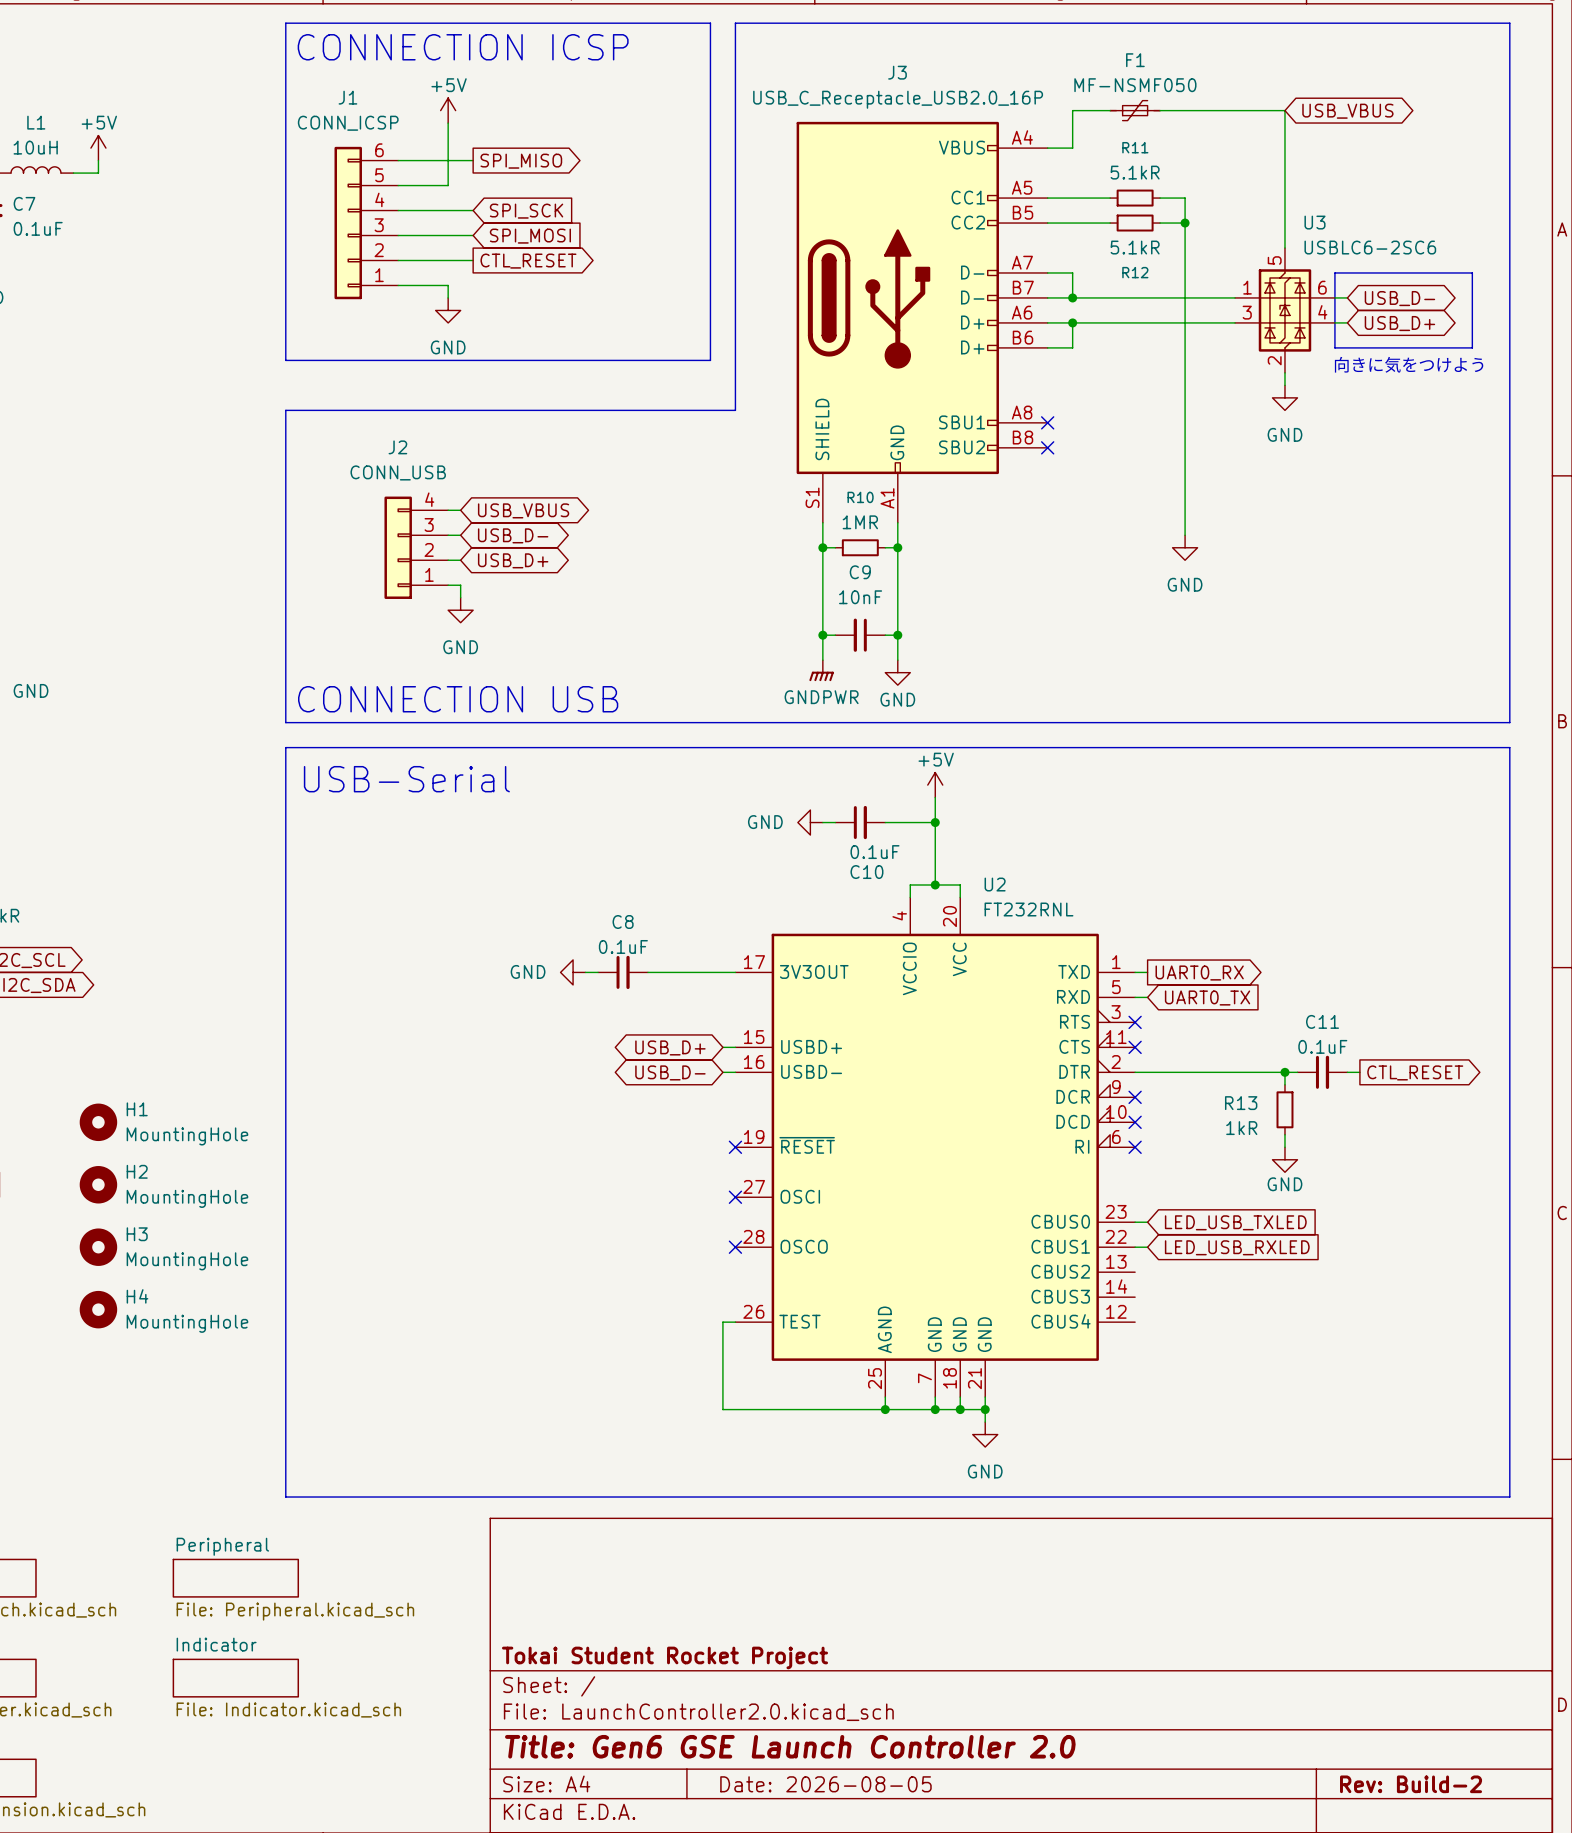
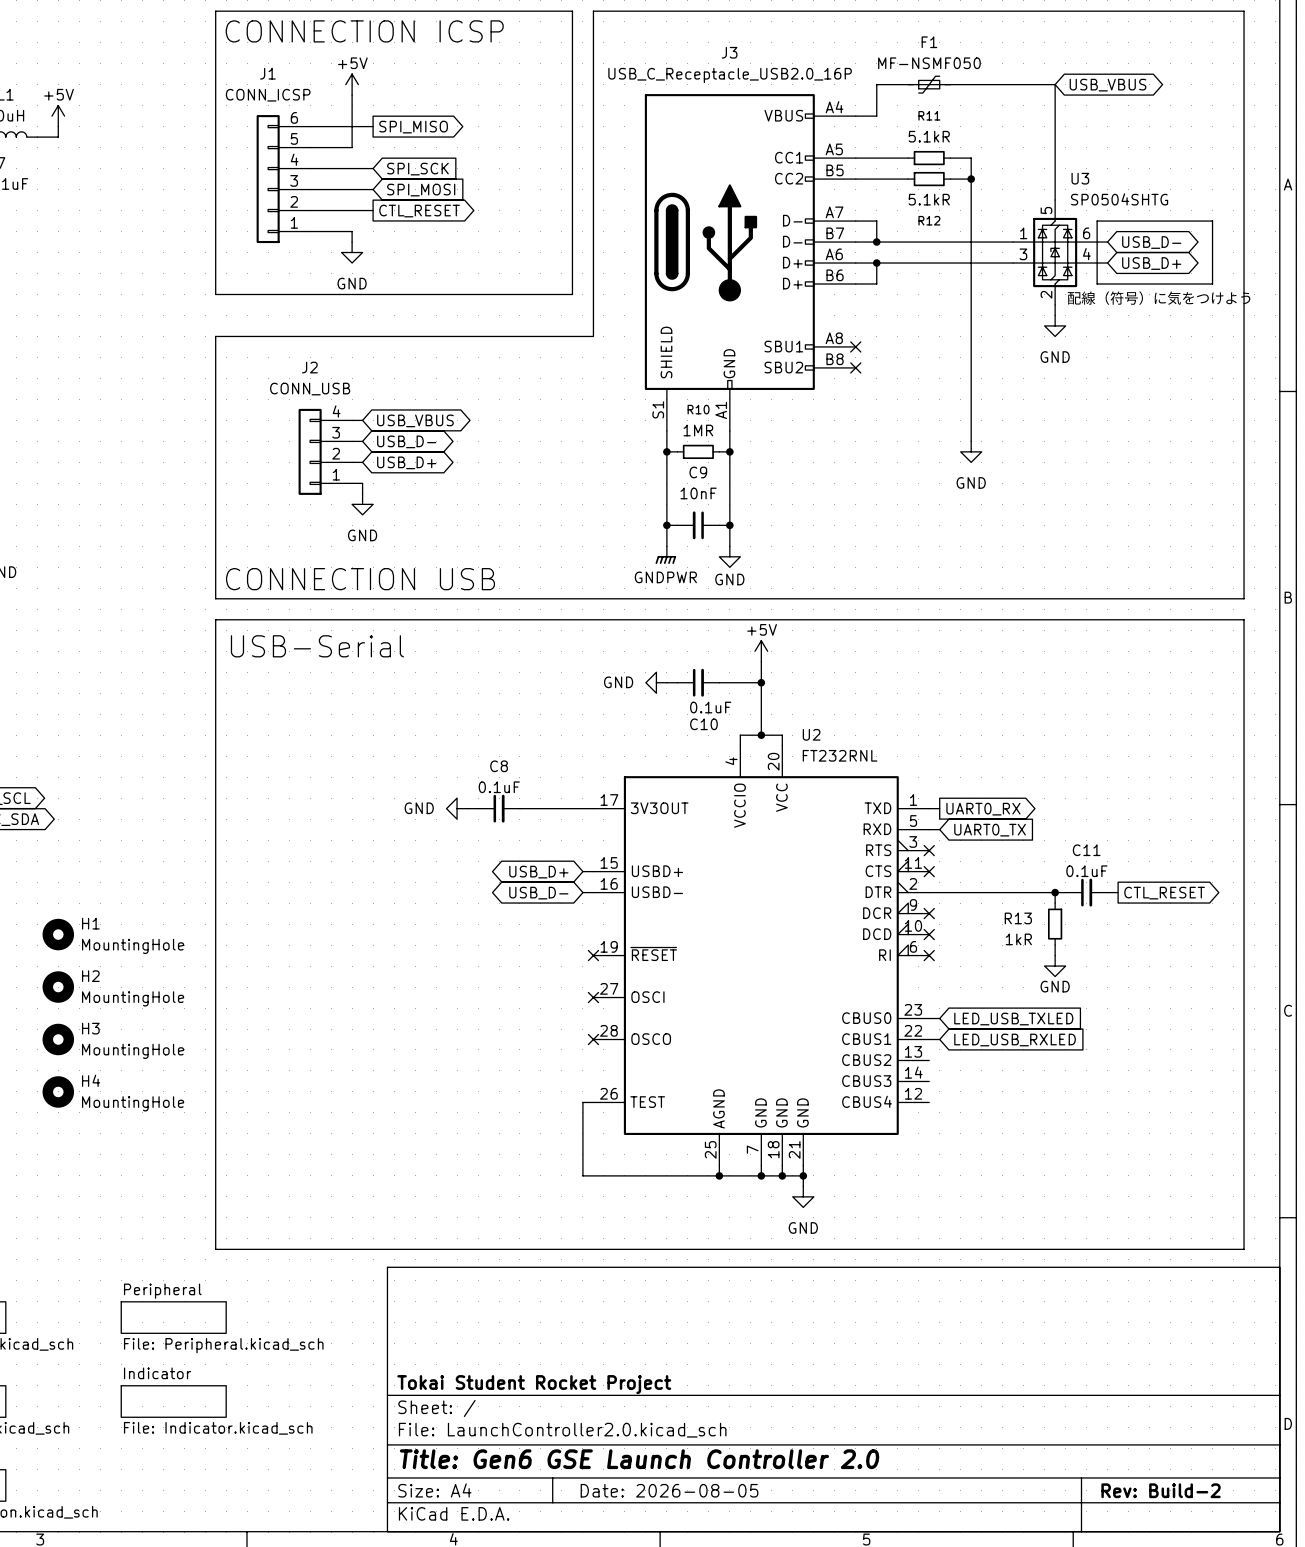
U3 value: USBLC6-2SC6 (1370, 247) -> SP0504SHTG (1119, 199)
text: 向きに気をつけよう (1409, 364) -> 配線（符号）に気をつけよう (1159, 298)

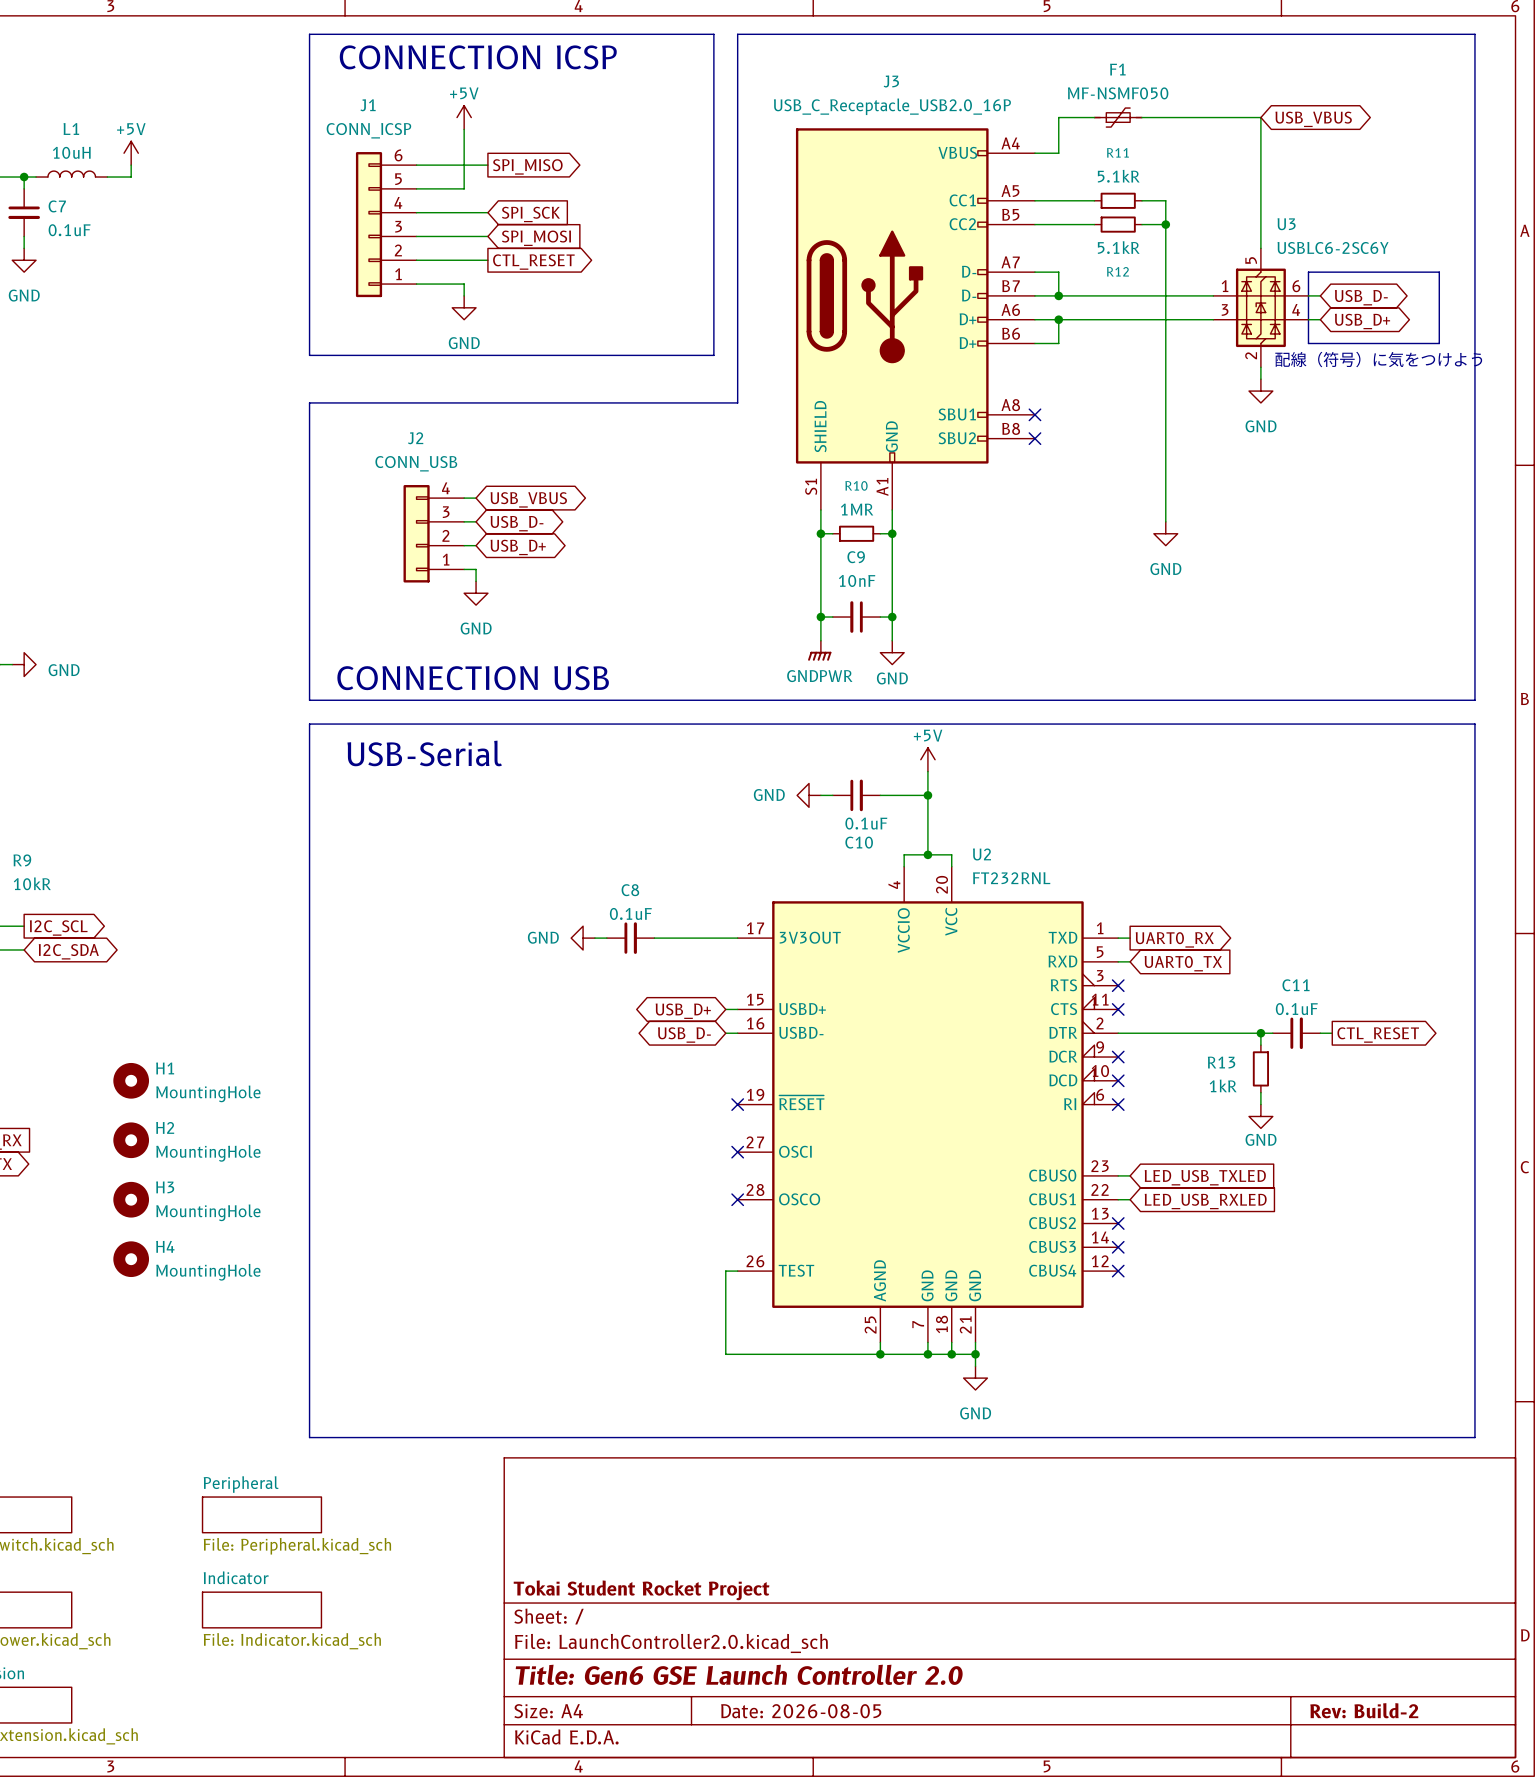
U3 value: SP0504SHTG (1119, 199) -> USBLC6-2SC6Y (1333, 247)
no-connect mark: none -> (1118, 1223)
no-connect mark: none -> (1118, 1247)
no-connect mark: none -> (1118, 1271)

